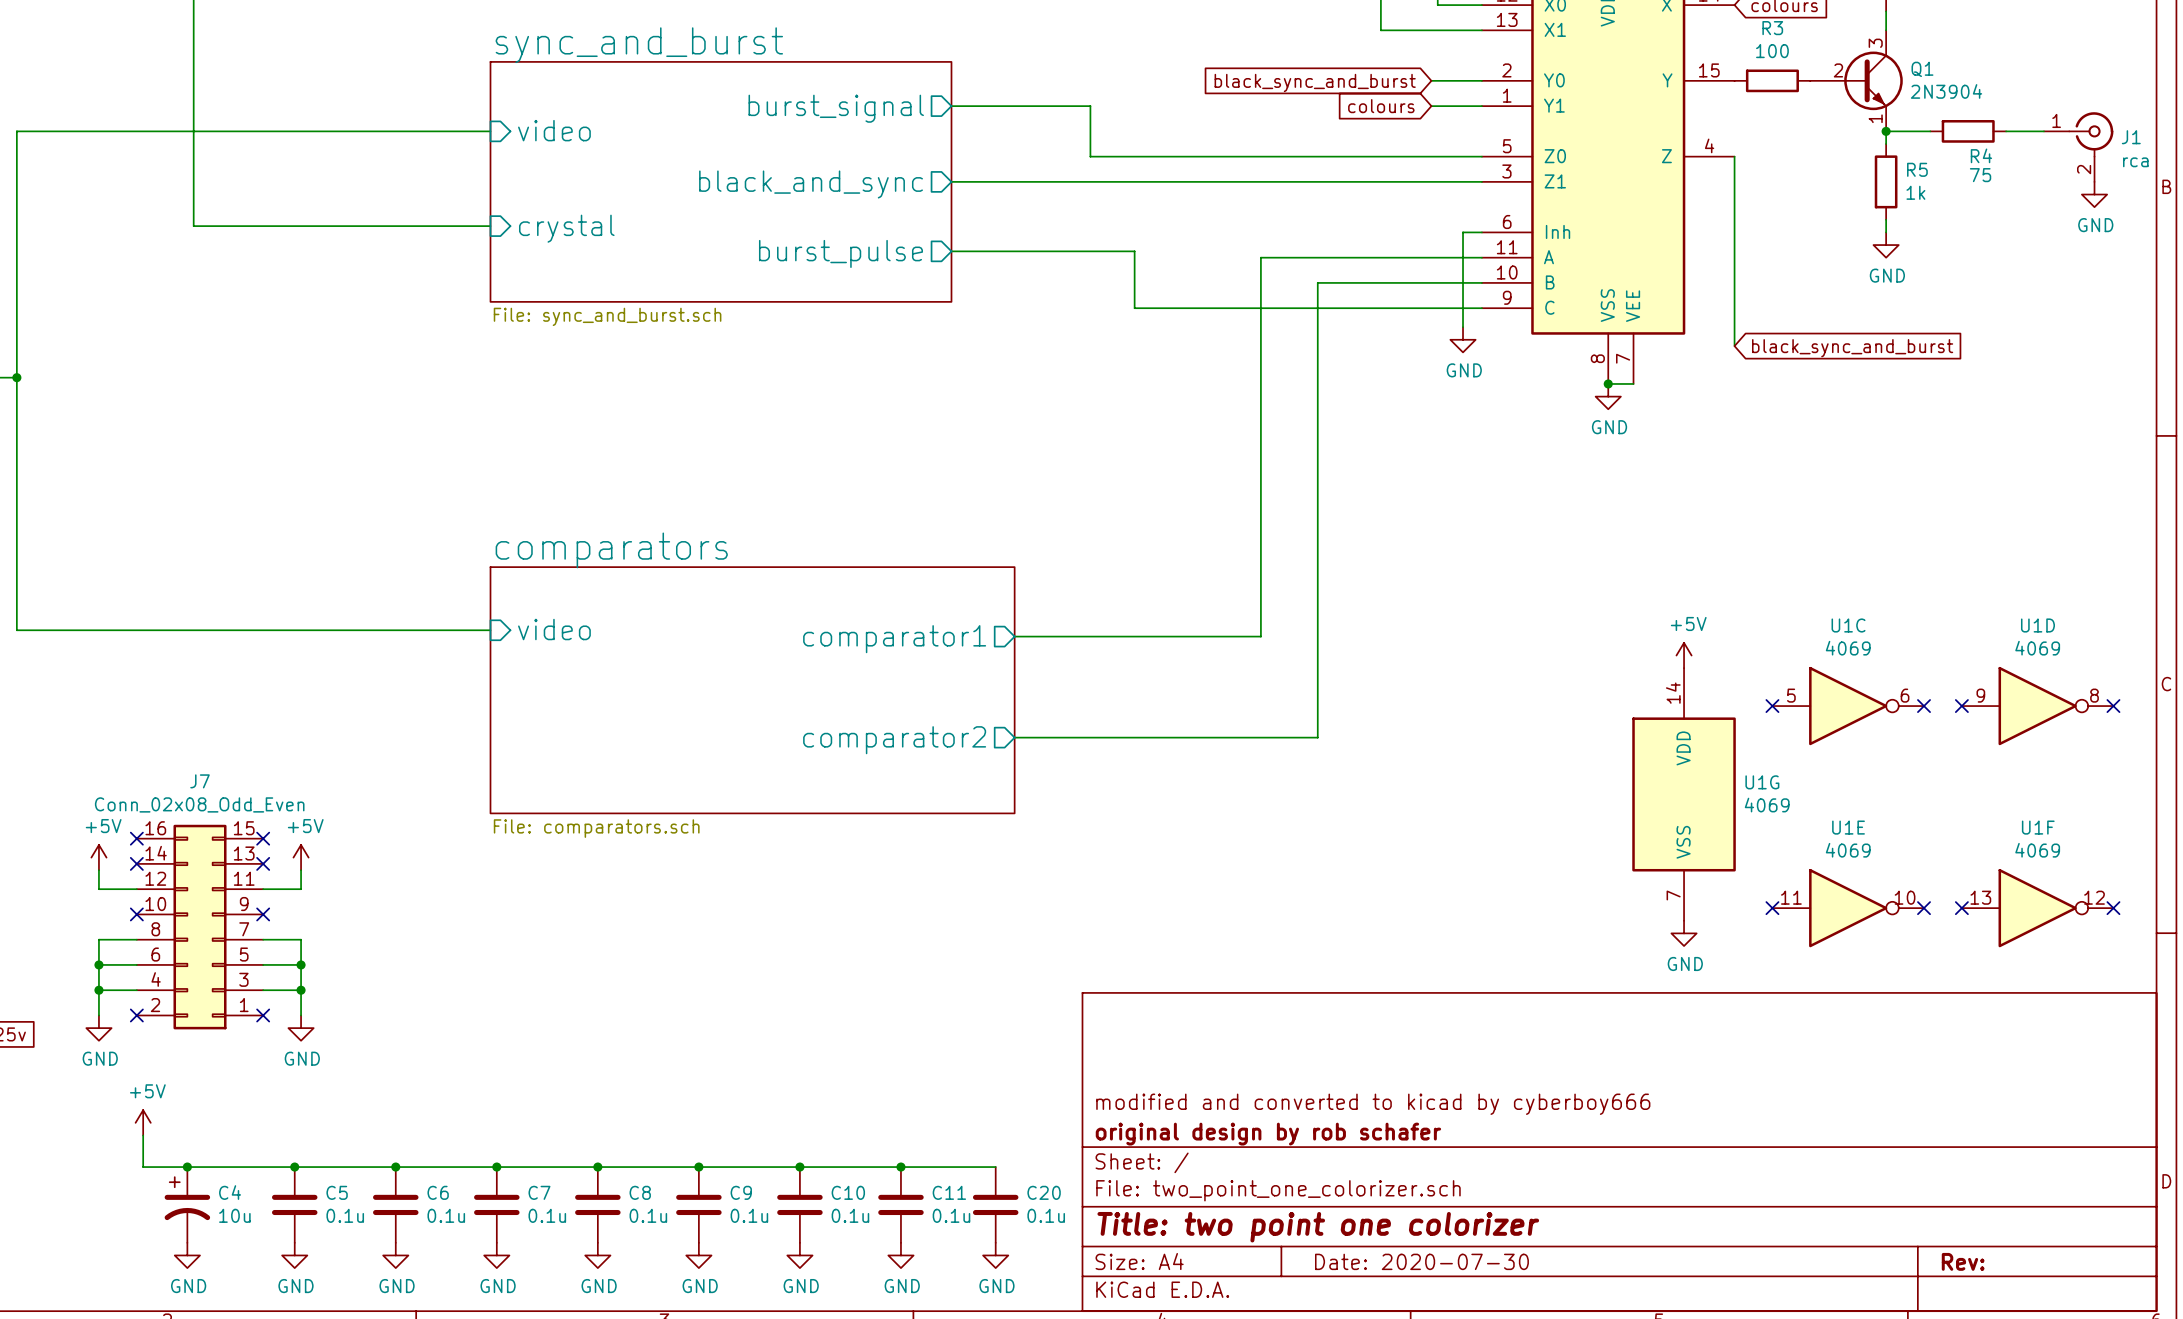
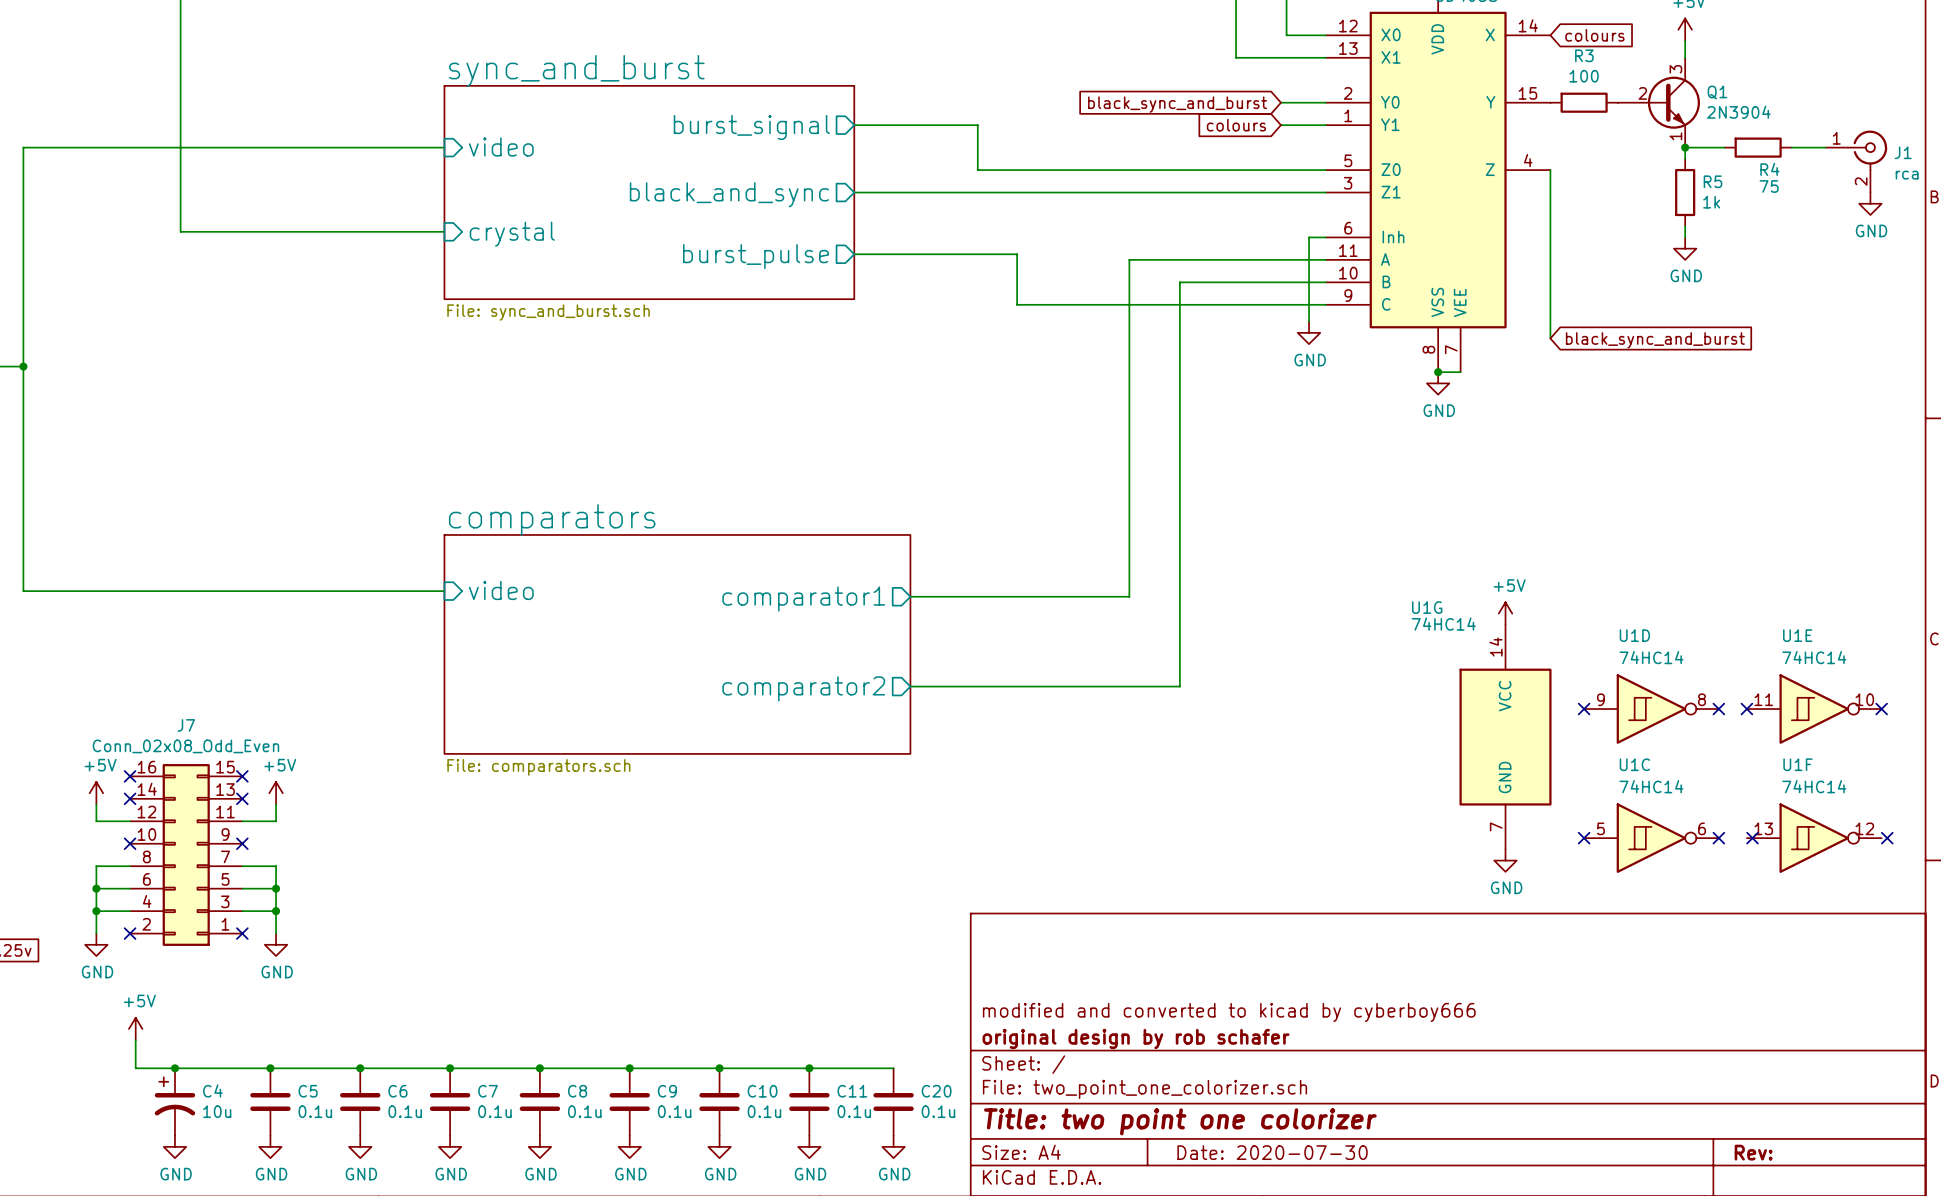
U1C value: 4069 (1848, 648) -> 74HC14 (1651, 786)
U1D value: 4069 (2037, 648) -> 74HC14 (1651, 657)
U1C symbol: [1772, 666, 1925, 746] -> [1584, 803, 1719, 873]
U1D symbol: [1961, 666, 2114, 746] -> [1584, 674, 1719, 744]
no-connect mark position: (1772, 706) -> (1584, 709)
no-connect mark: (1924, 706) -> none
no-connect mark: (1961, 706) -> none
no-connect mark position: (2113, 706) -> (1881, 709)
U1G pin name: VDD (1683, 748) -> VCC (1505, 696)
no-connect mark: none -> (1718, 709)
no-connect mark: none -> (1746, 709)
U1G name position: U1G (1762, 782) -> U1G (1427, 607)
U1G value: 4069 (1767, 805) -> 74HC14 (1443, 624)
U1G pin name: VSS (1683, 842) -> GND (1505, 777)
U1E value: 4069 (1848, 850) -> 74HC14 (1814, 657)
U1F value: 4069 (2037, 850) -> 74HC14 (1814, 786)
U1E symbol: [1772, 868, 1925, 948] -> [1746, 674, 1882, 744]
U1F symbol: [1961, 868, 2114, 948] -> [1746, 803, 1882, 873]

